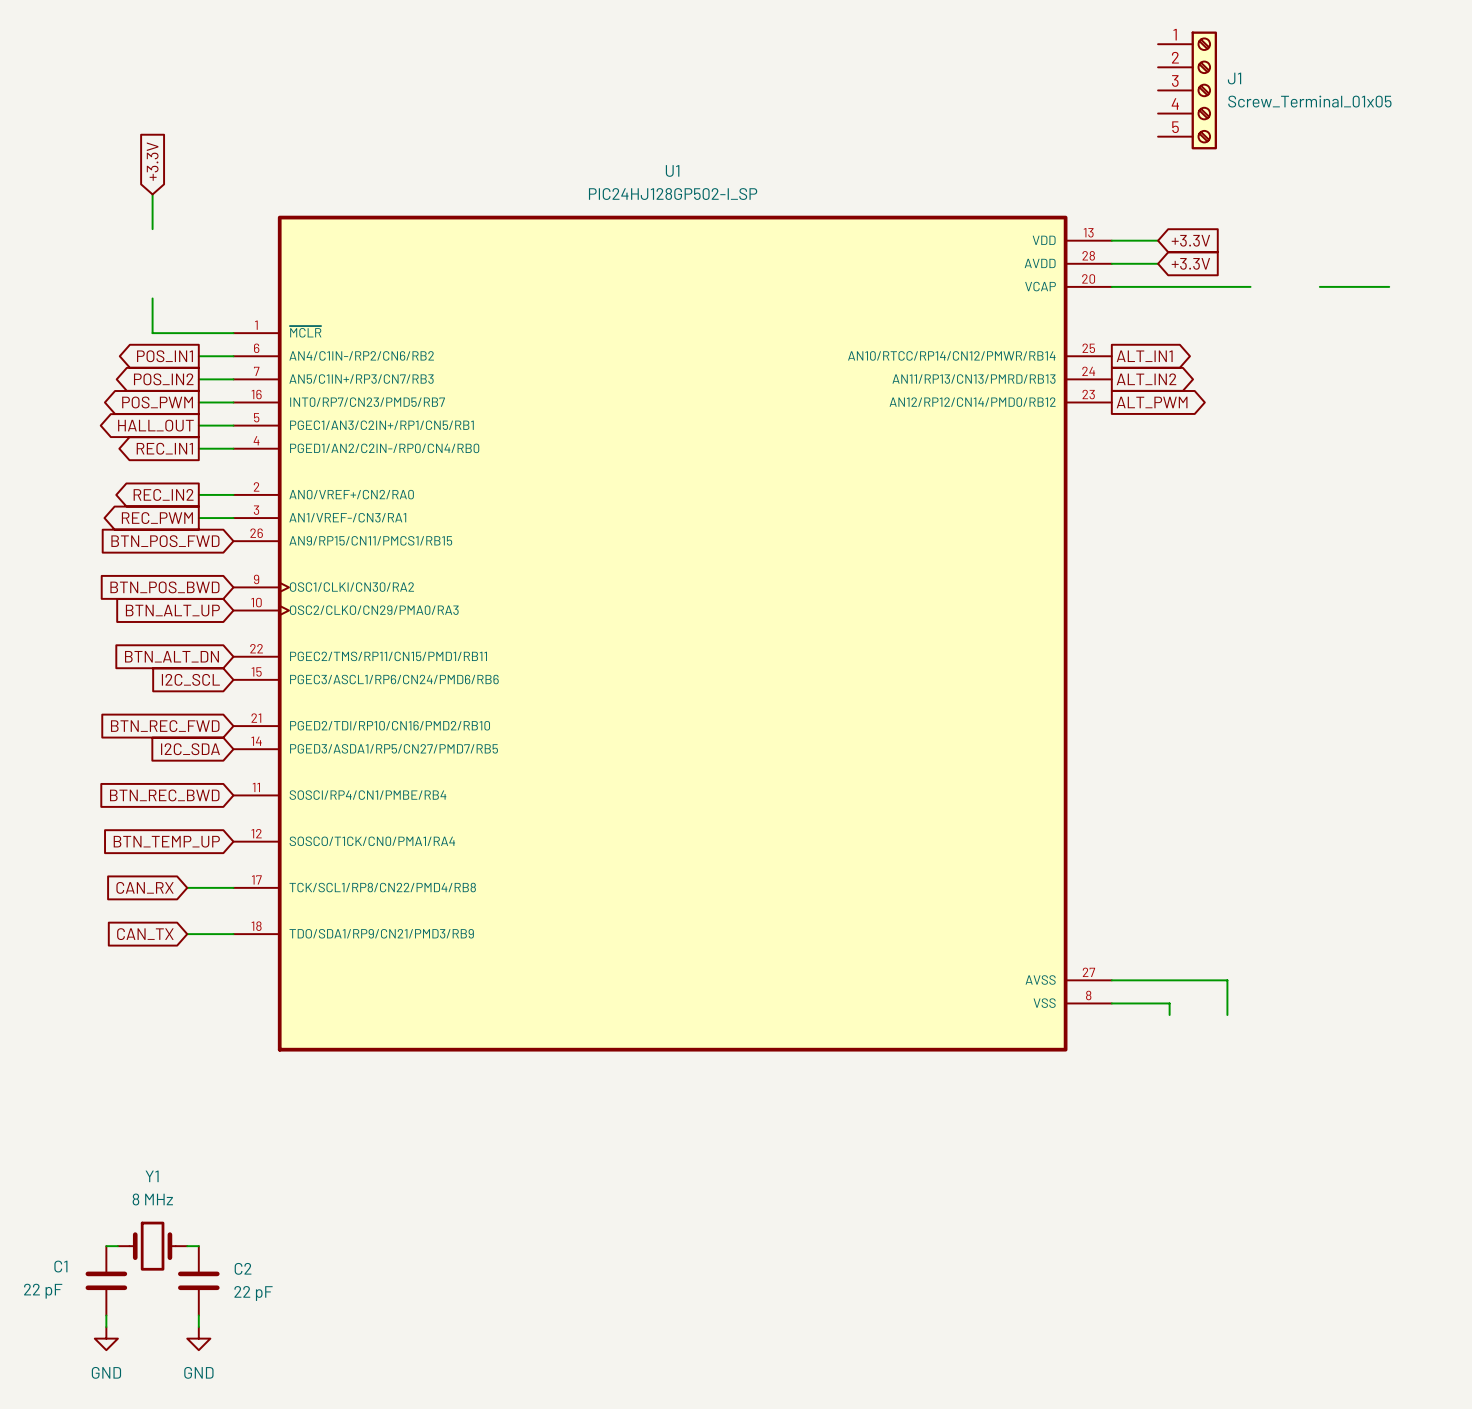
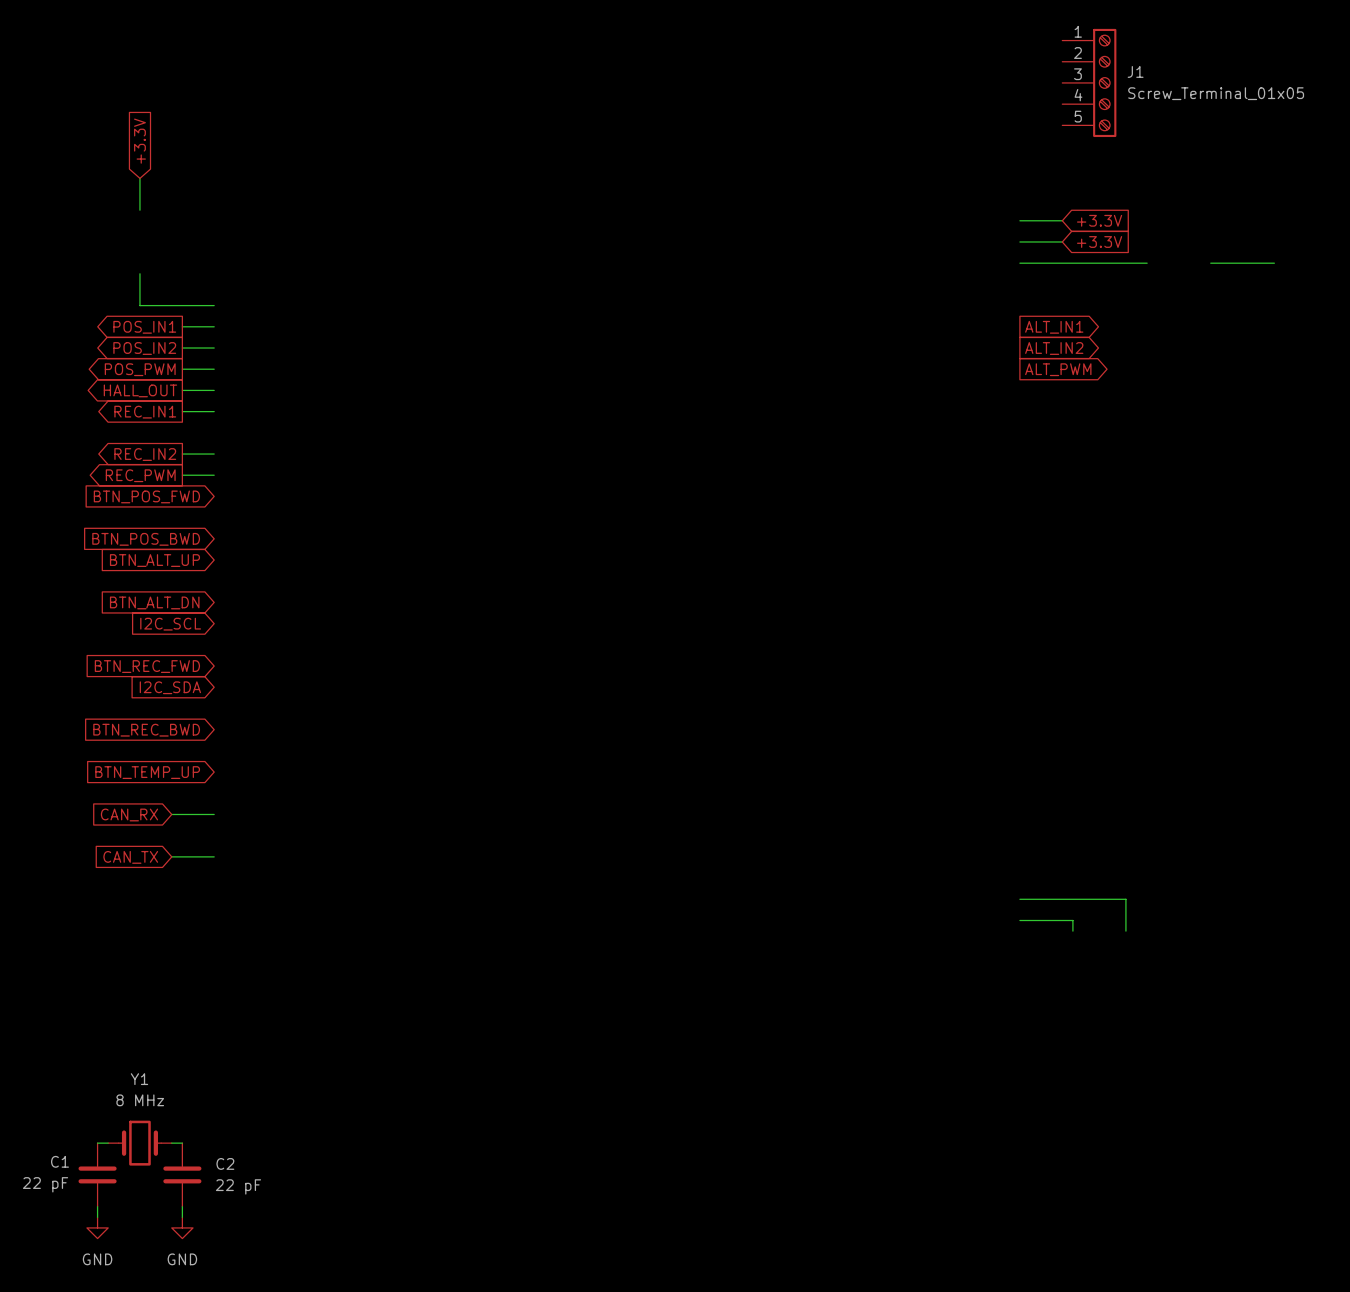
U1: PIC24HJ128GP502-I_SP (672, 633) -> none

